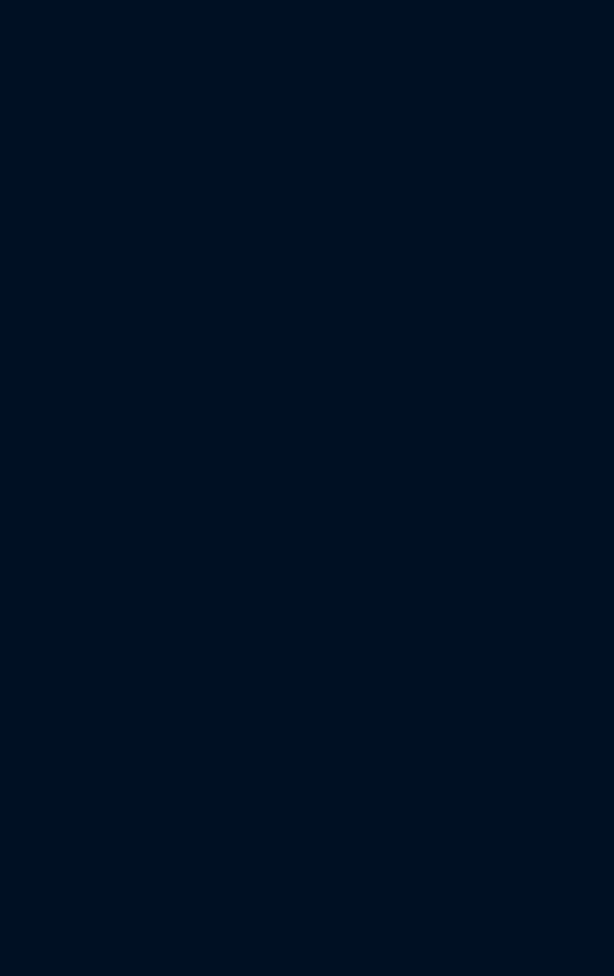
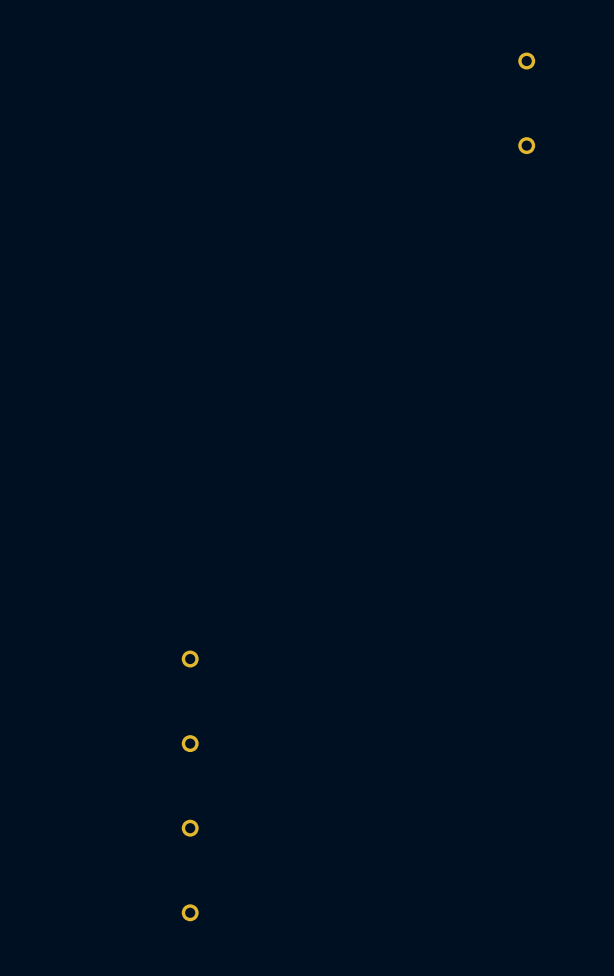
part: none -> (526, 61)
part: none -> (526, 145)
part: none -> (190, 659)
part: none -> (190, 743)
part: none -> (190, 828)
part: none -> (190, 912)

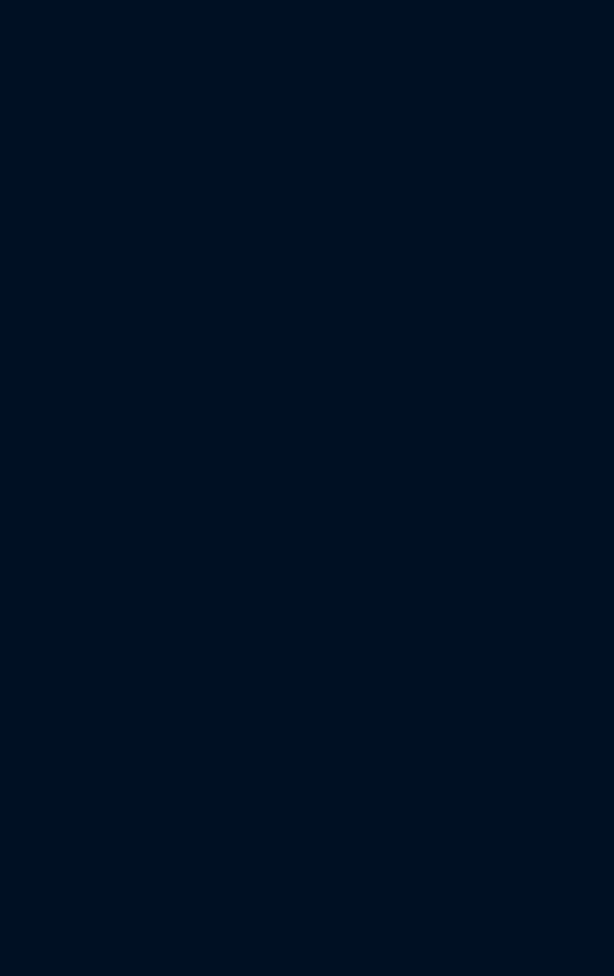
part: (526, 61) -> none
part: (526, 145) -> none
part: (190, 659) -> none
part: (190, 743) -> none
part: (190, 828) -> none
part: (190, 912) -> none

